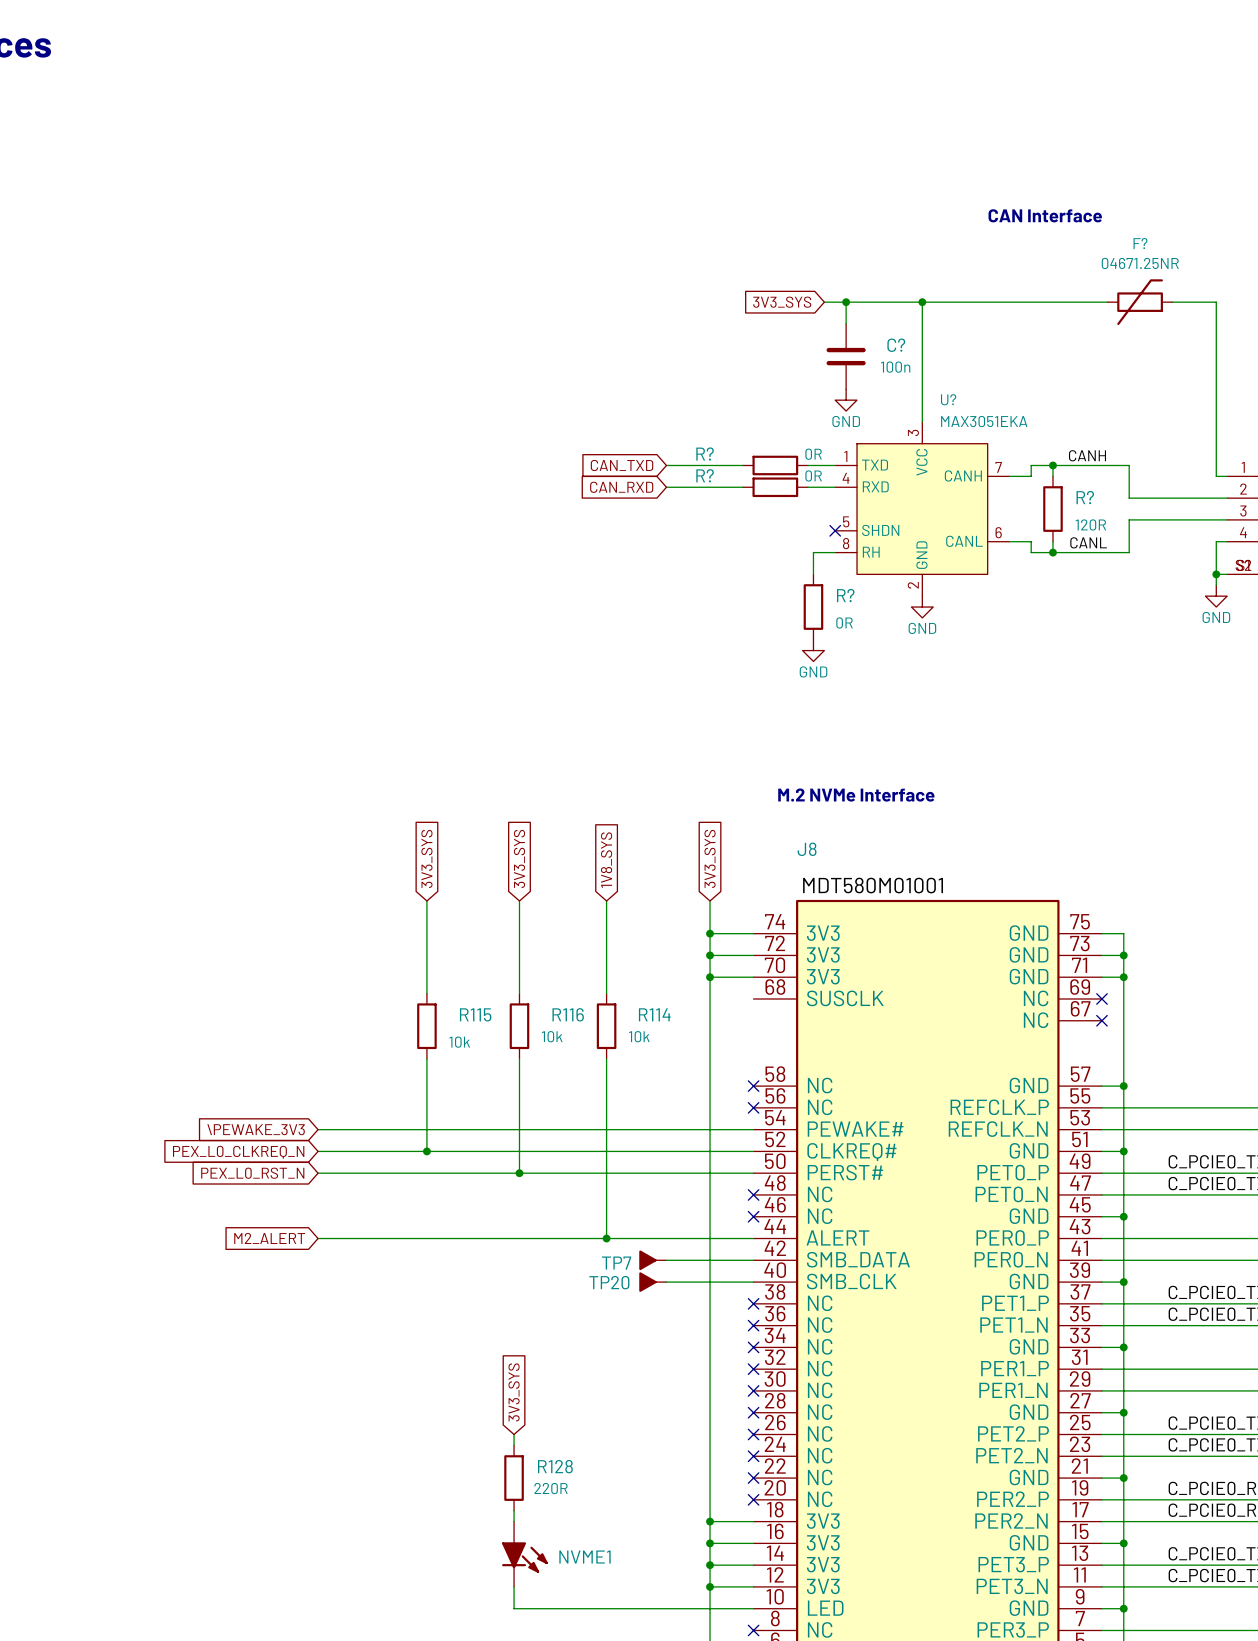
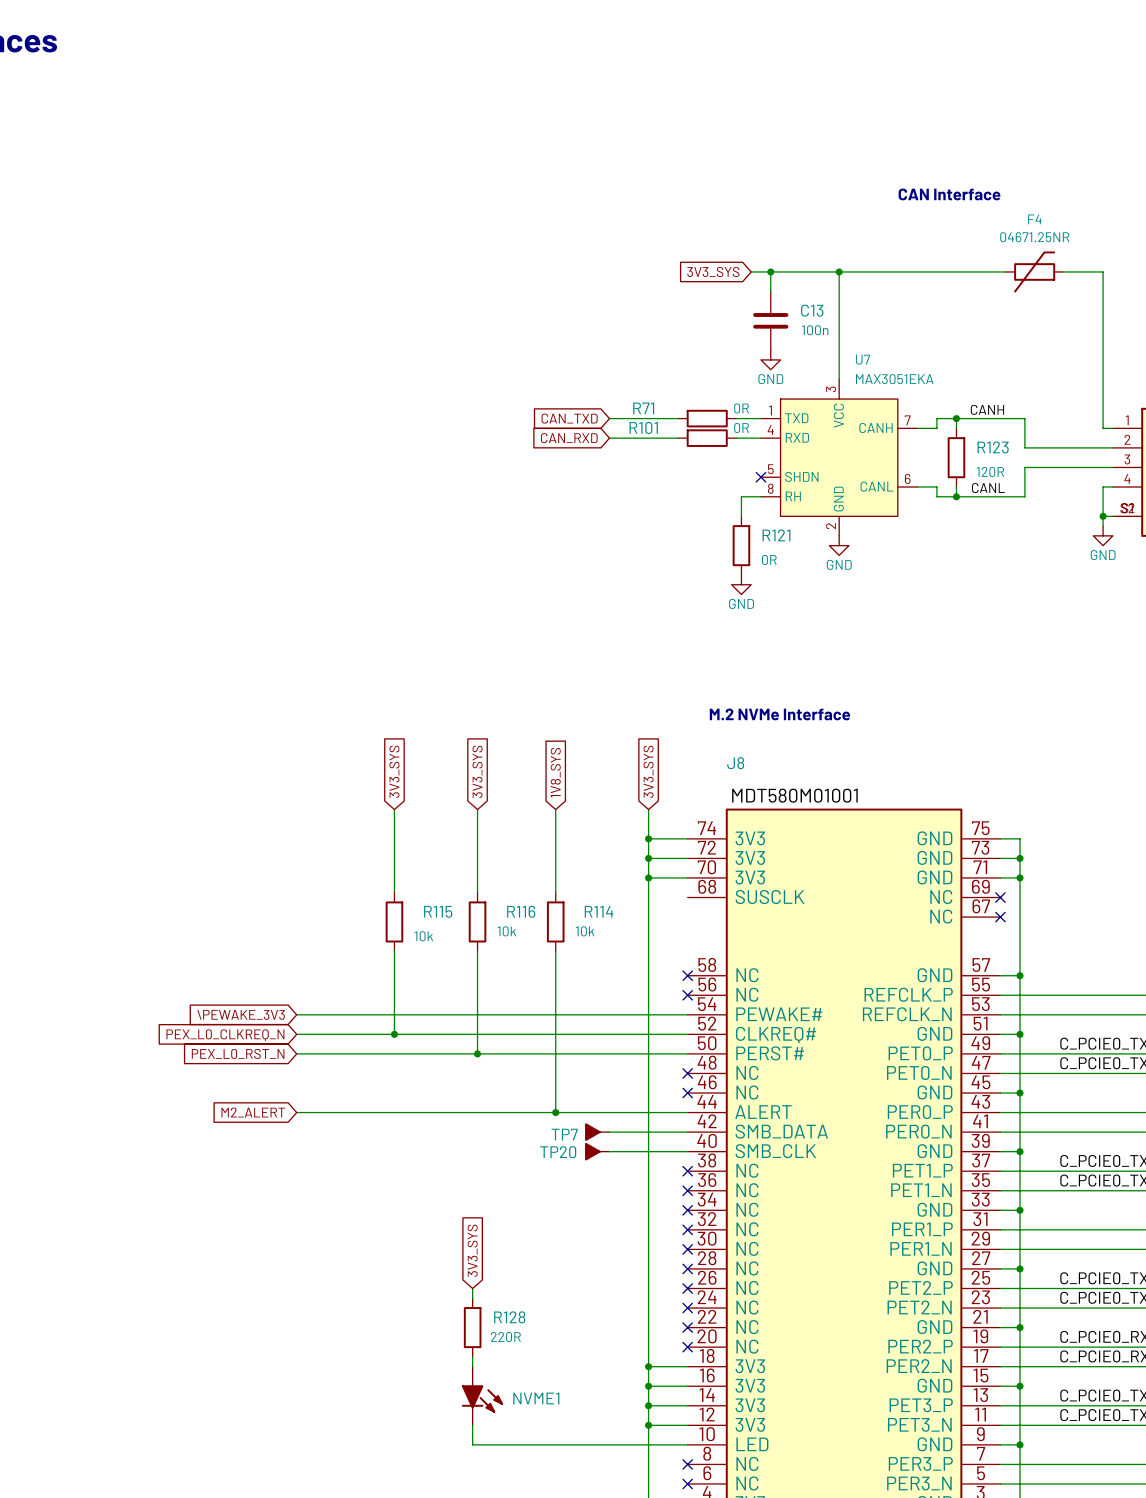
F? name: F? (1140, 243) -> F4 (1034, 219)
C? name: C? (896, 345) -> C13 (812, 310)
U? name: U? (948, 399) -> U7 (862, 359)
R? name: R? (705, 454) -> R71 (643, 408)
R? name: R? (705, 475) -> R101 (643, 427)
R? name: R? (1085, 497) -> R123 (993, 447)
R? name: R? (845, 595) -> R121 (776, 535)

